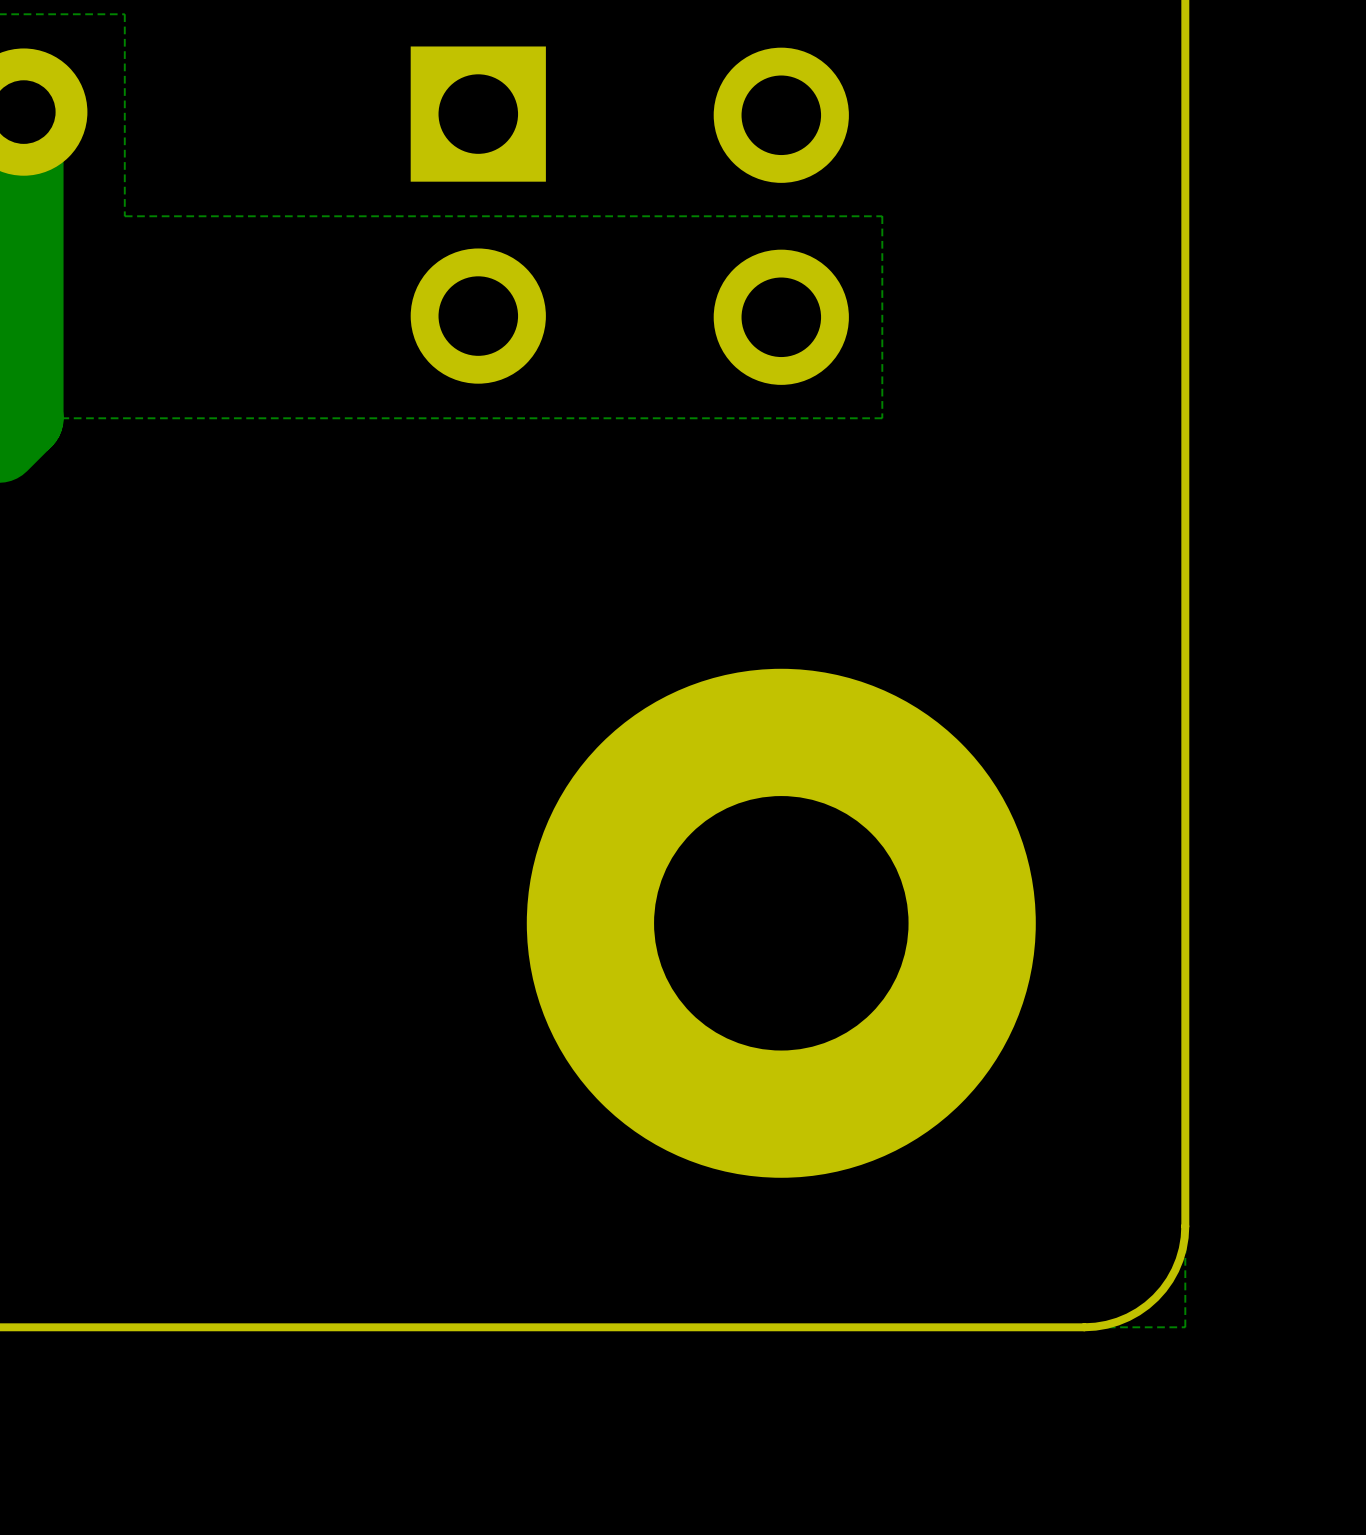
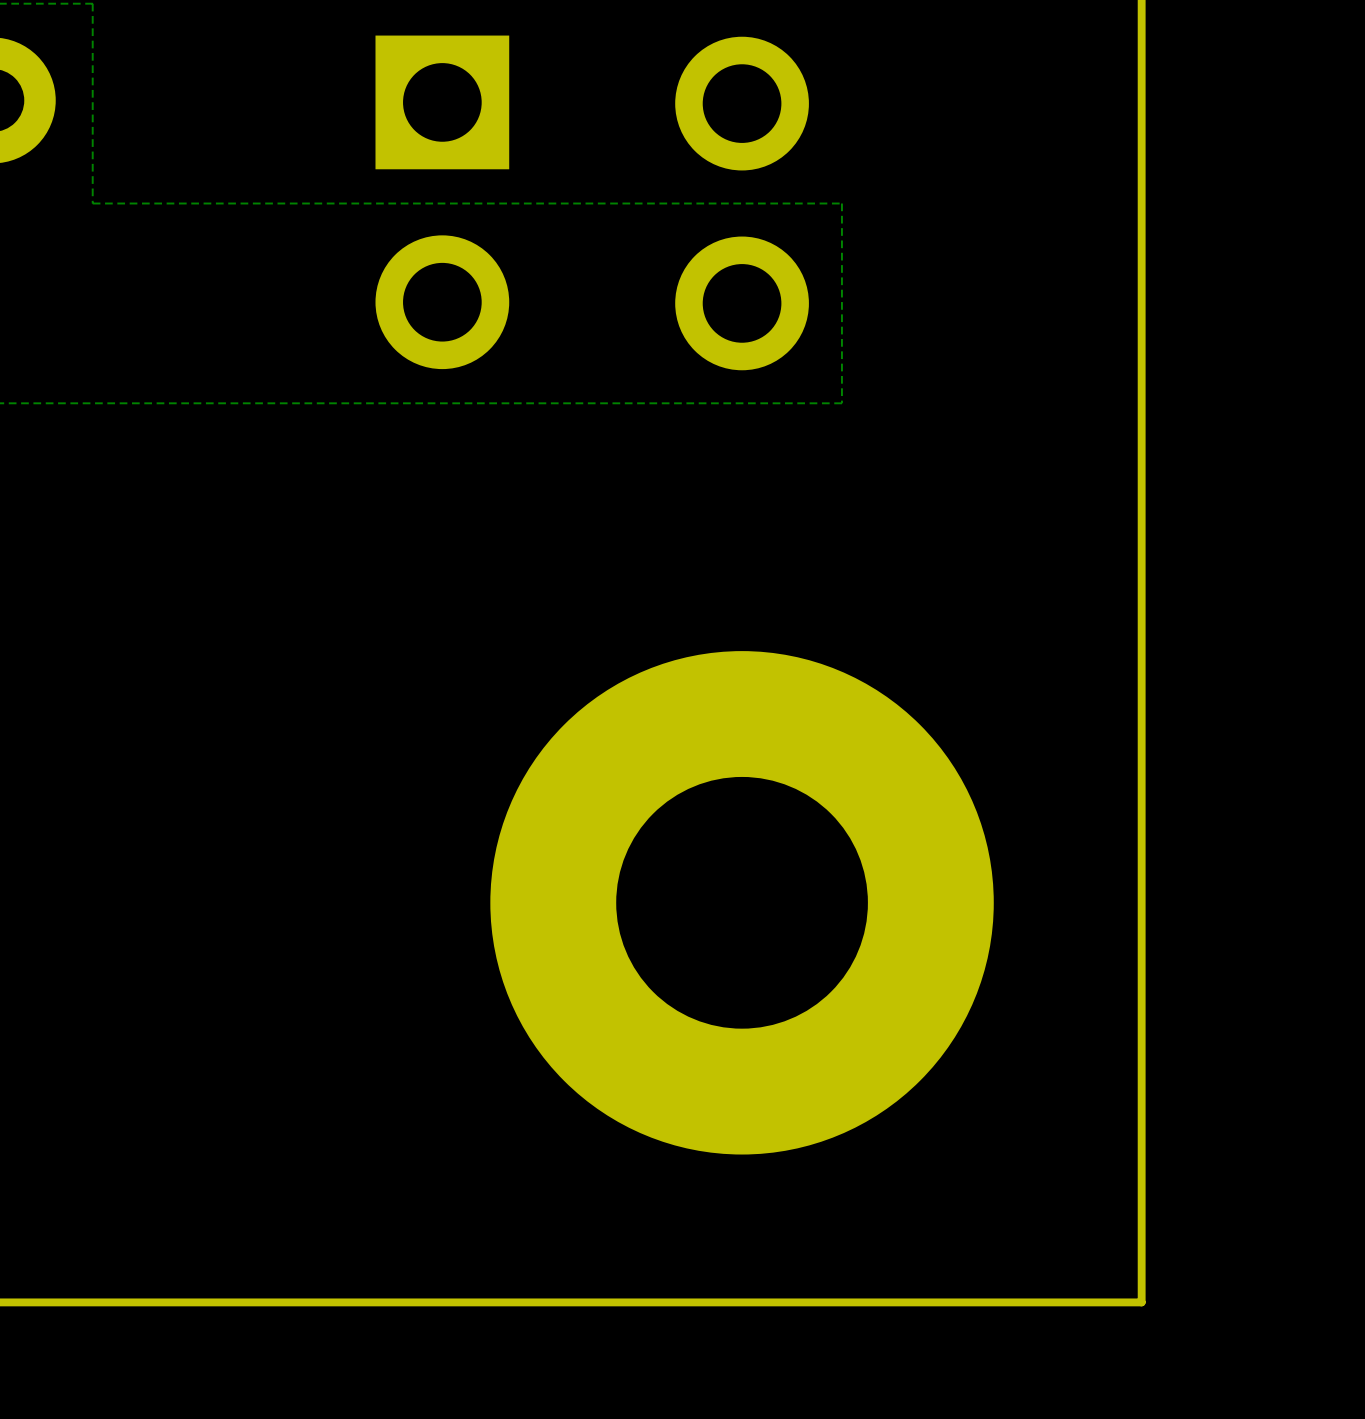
board edge: (1185, 1226) (1179, 1259) (1169, 1280) (1155, 1297) (1138, 1311) (1117, 1321) (1084, 1327) -> (1141, 1202) (1141, 1302) (1041, 1302)

